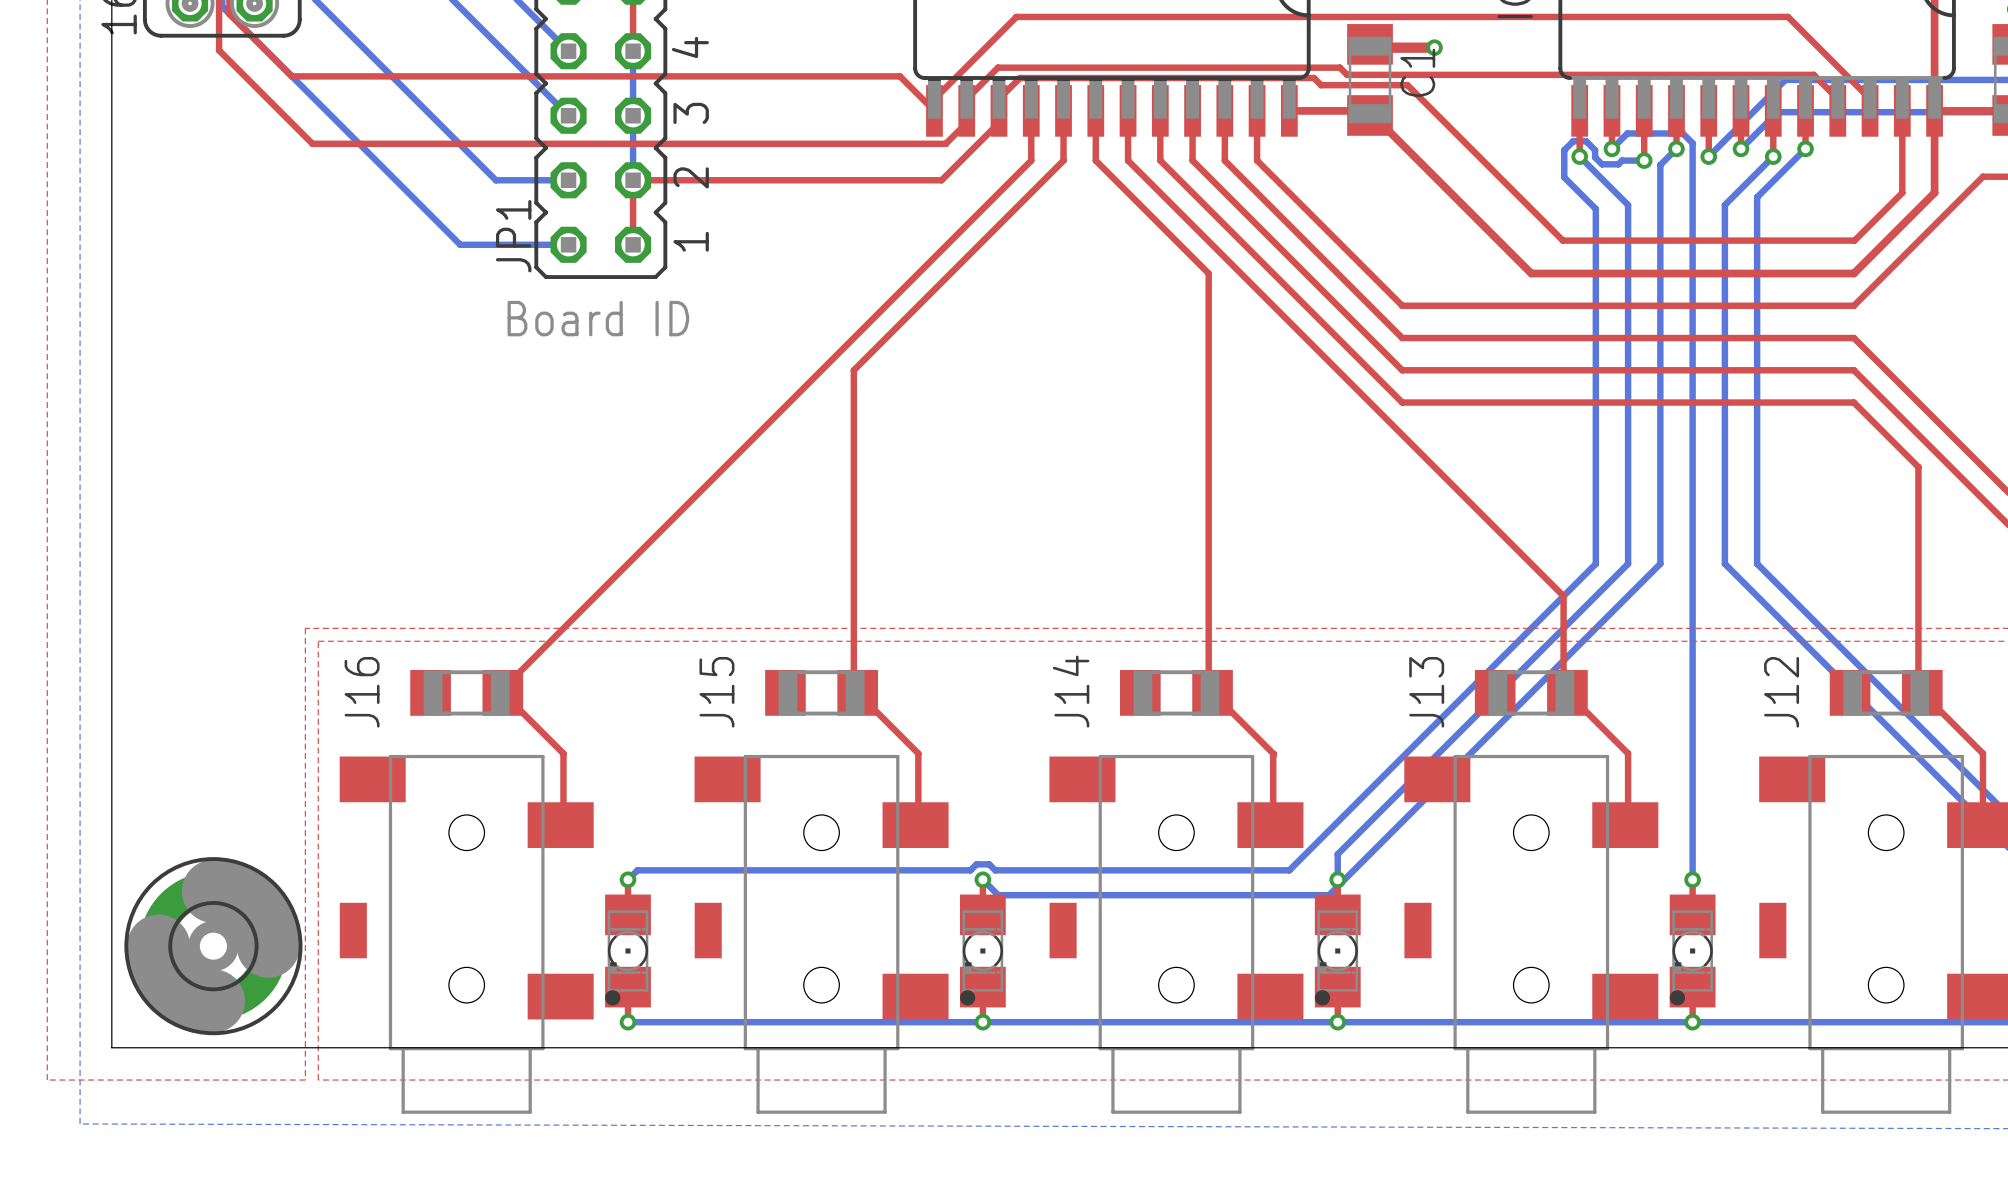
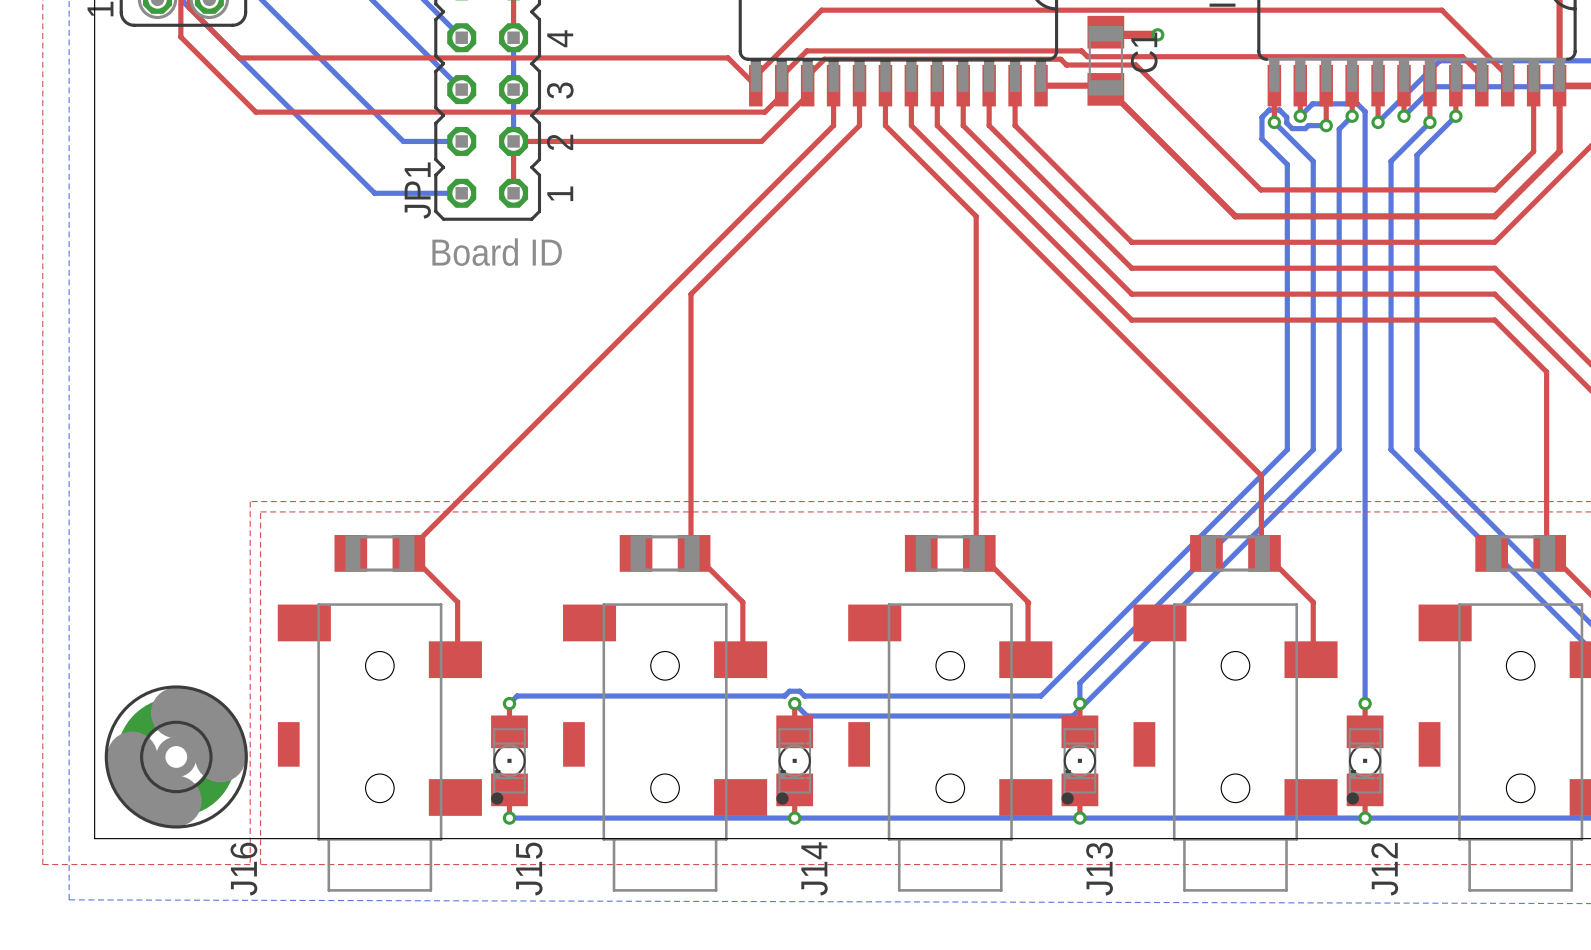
J14 name position: J14 (1071, 691) -> J14 (814, 868)
J16 name position: J16 (362, 692) -> J16 (243, 869)
J15 name position: J15 (716, 692) -> J15 (529, 869)
J13 name position: J13 (1426, 692) -> J13 (1099, 869)
J12 name position: J12 (1781, 692) -> J12 (1384, 869)

